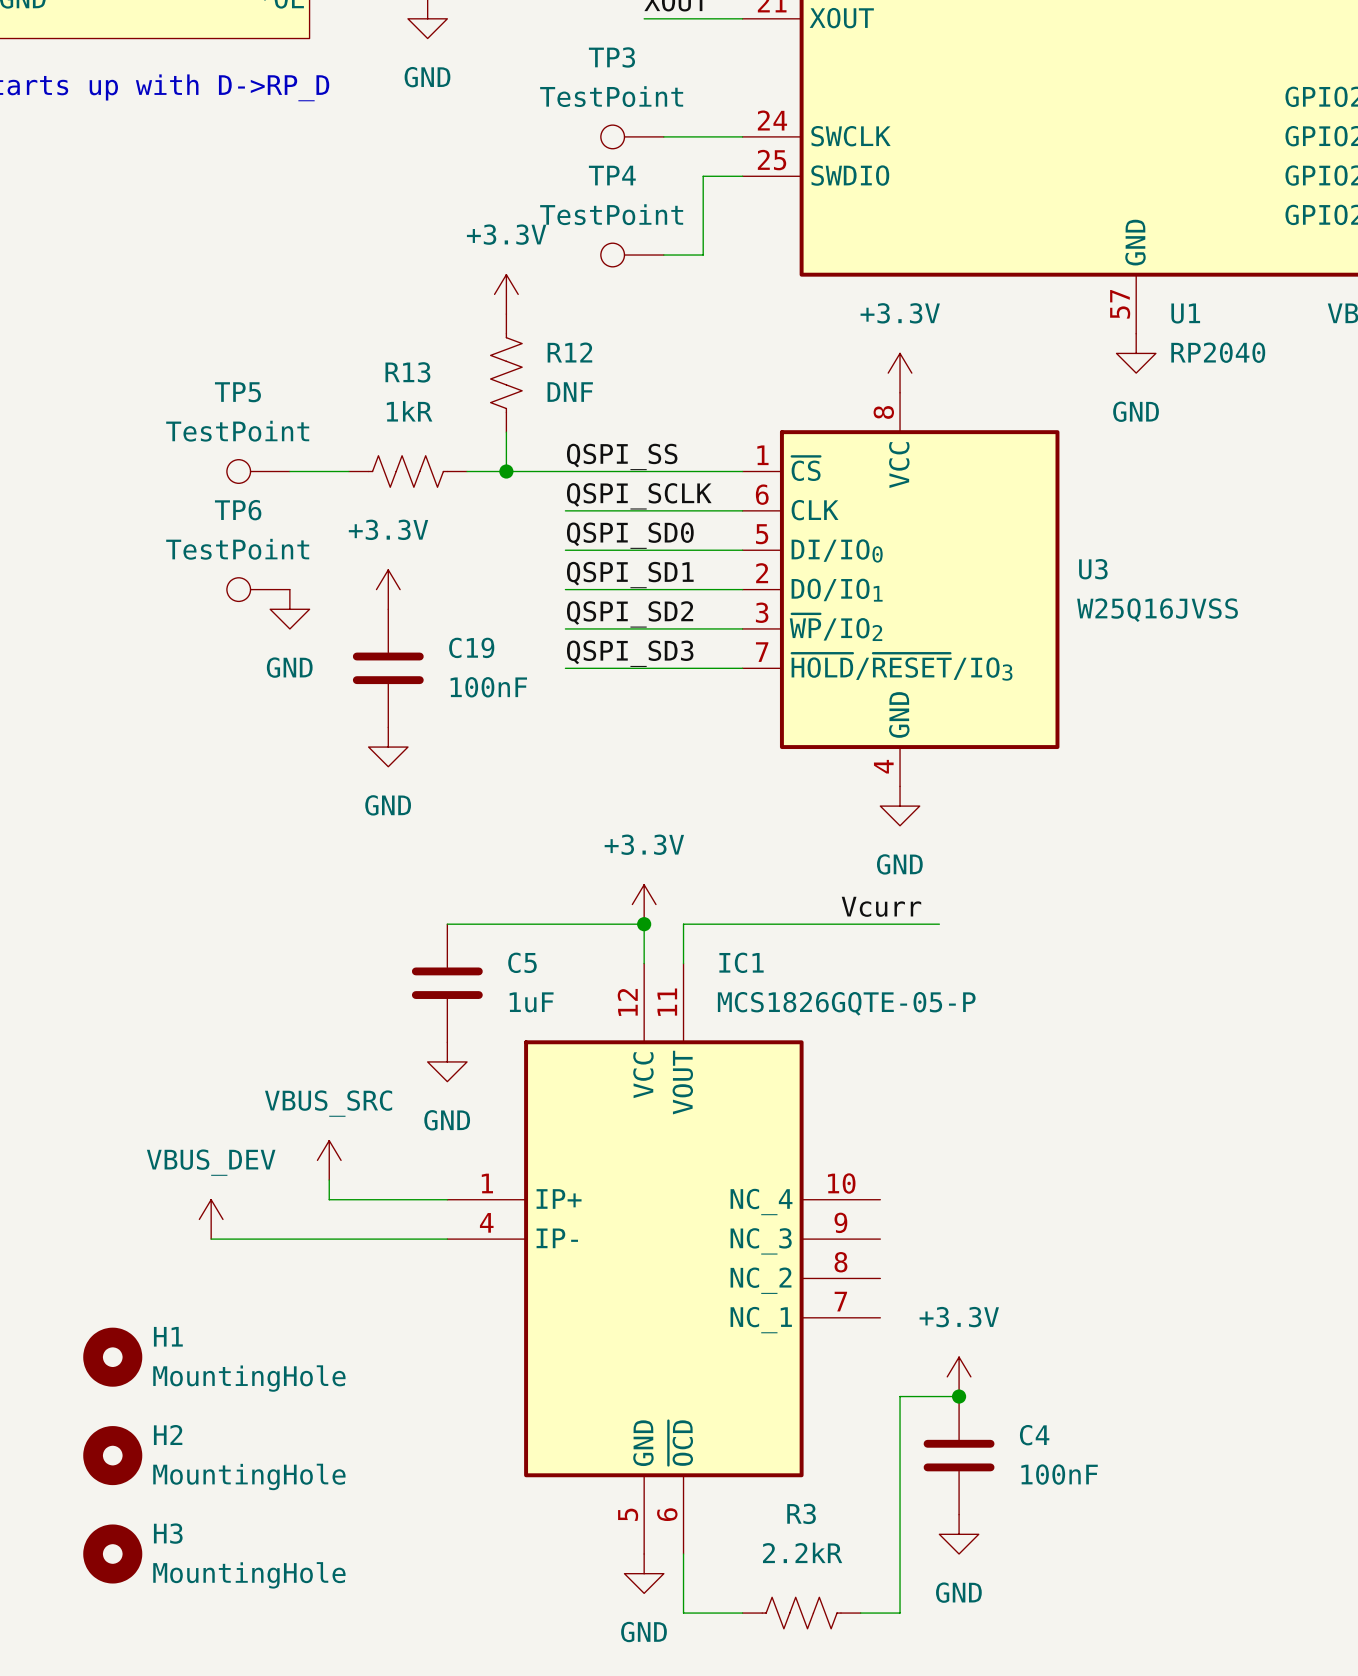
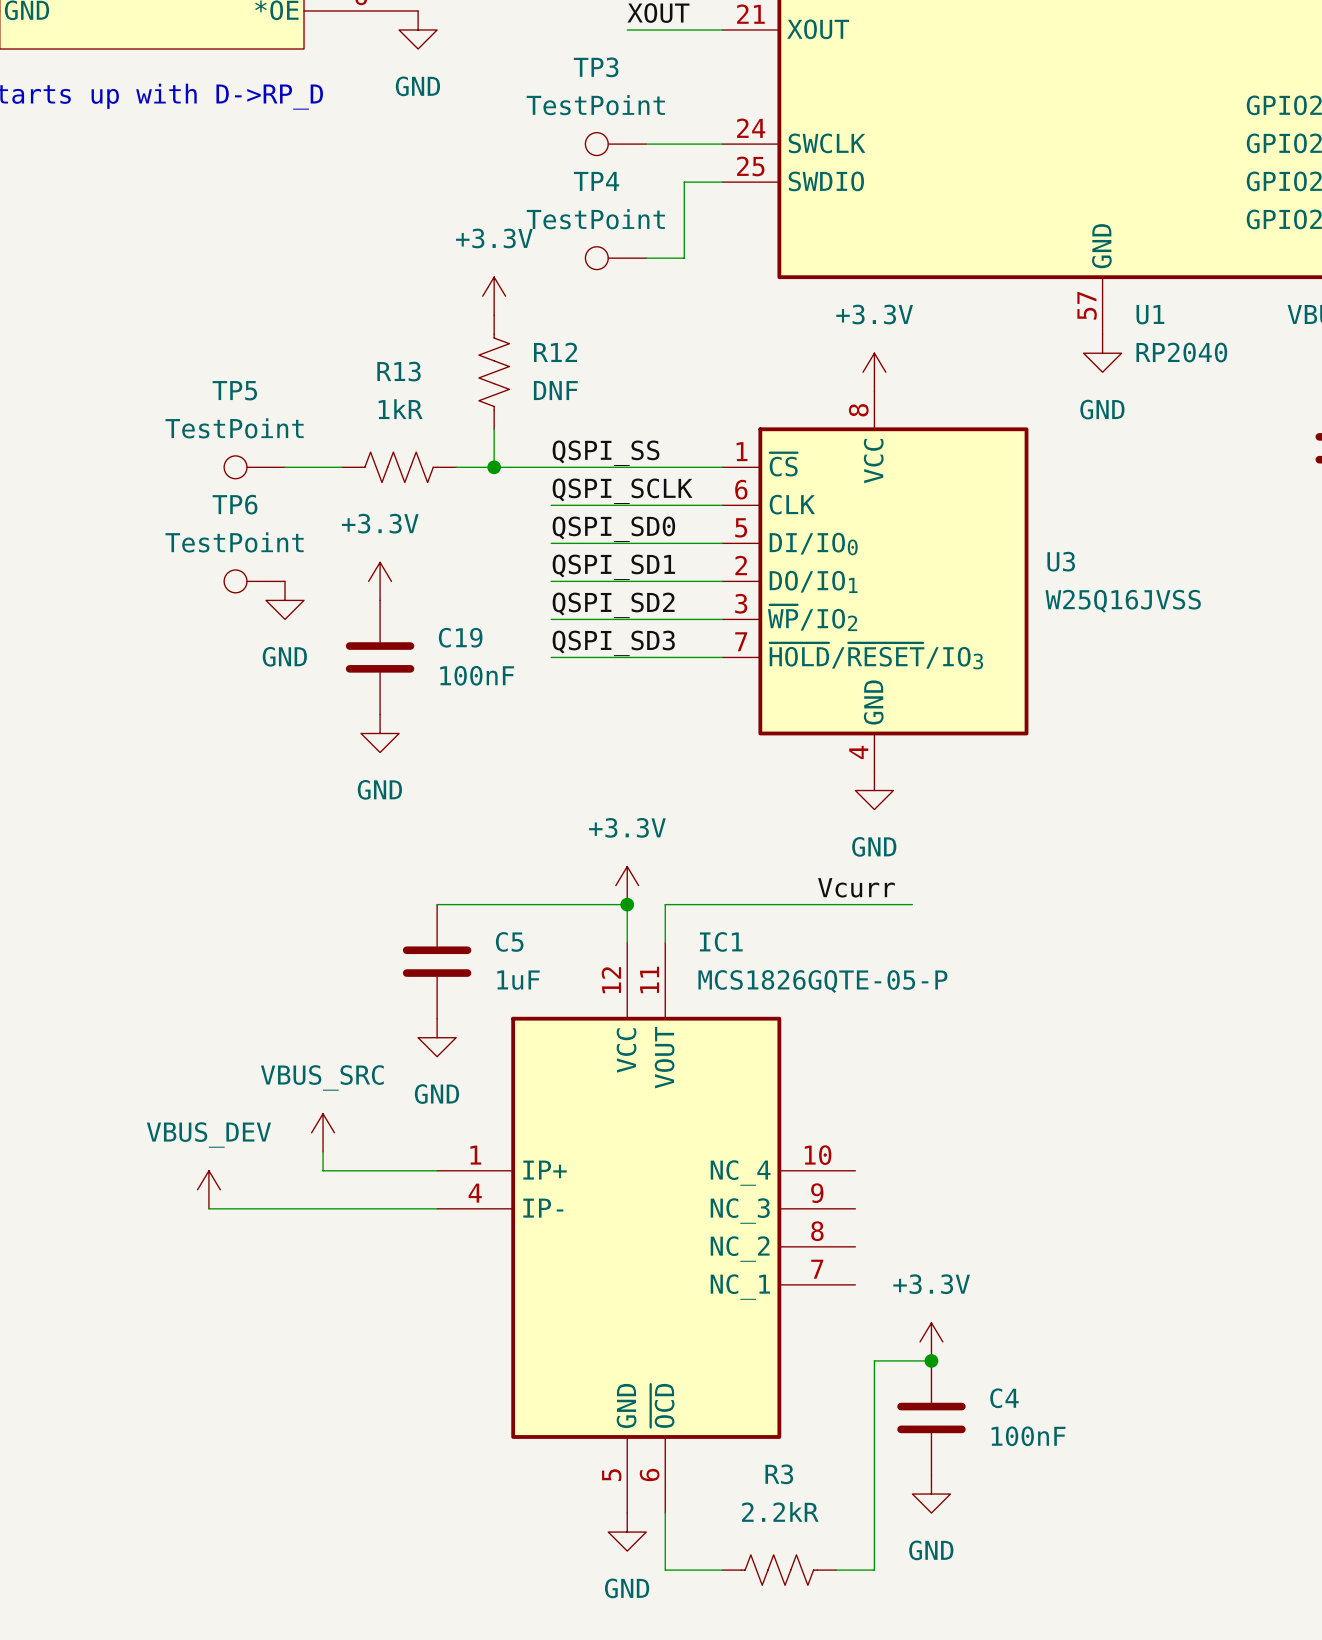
H1: MountingHole (112, 1357) -> none
H2: MountingHole (112, 1455) -> none
H3: MountingHole (112, 1554) -> none

